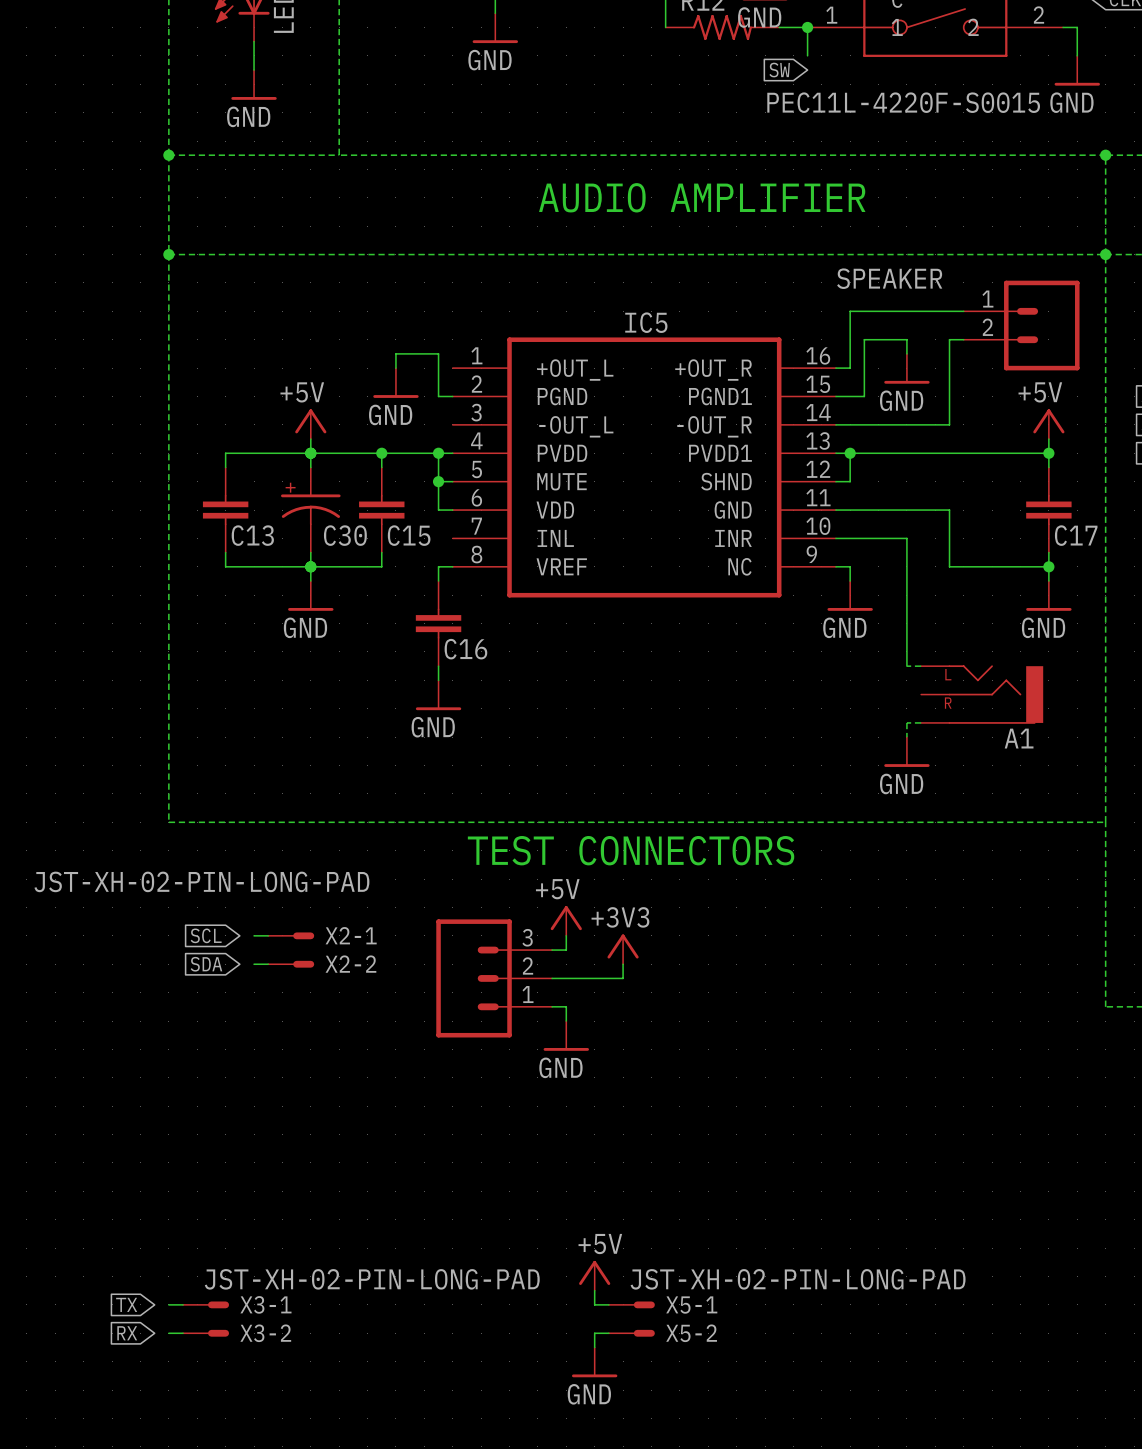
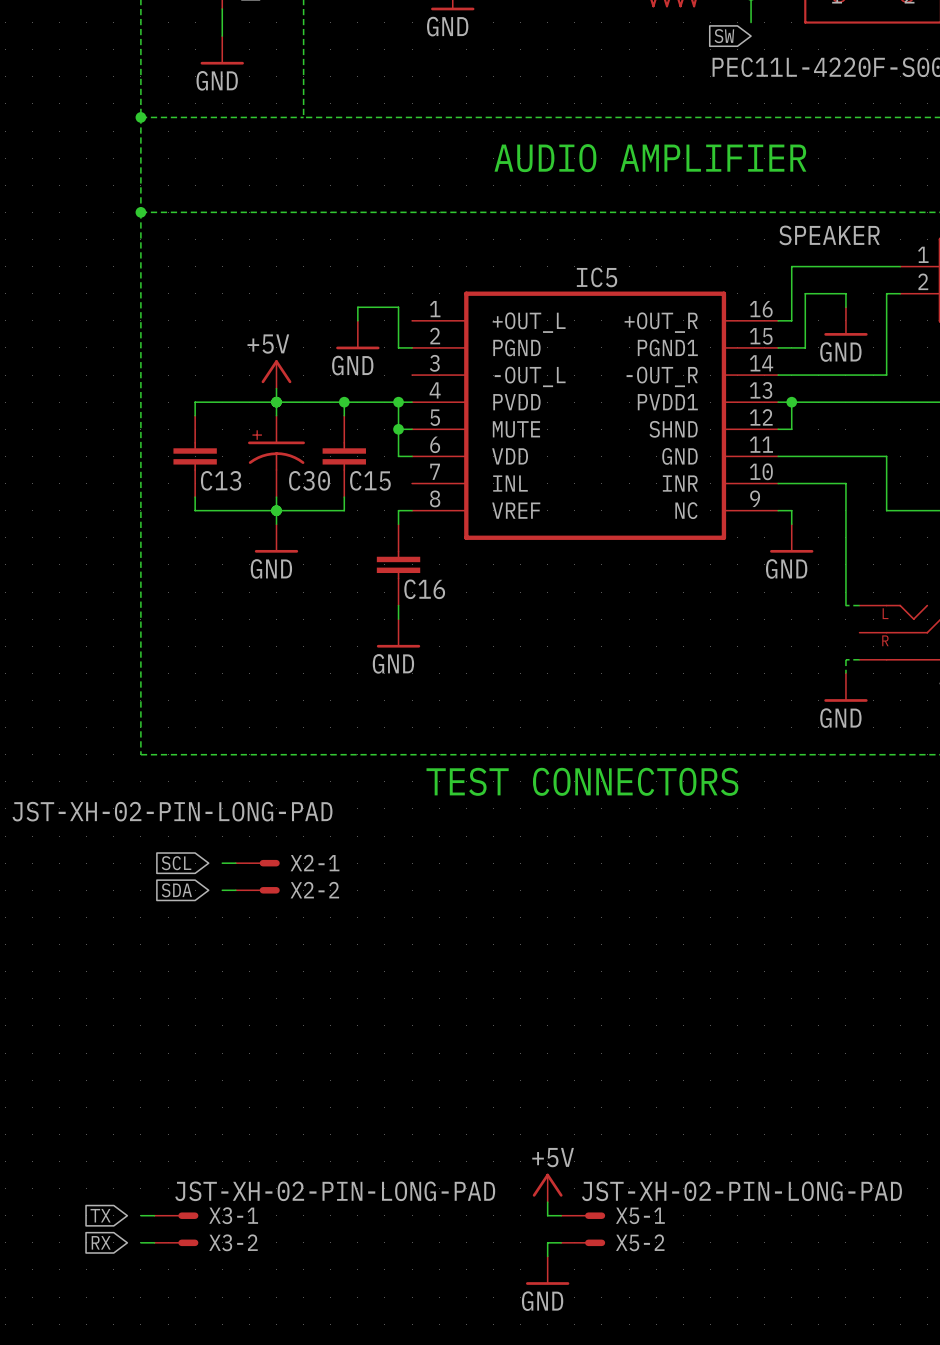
power symbol: +5V (566, 920) -> none
wire: (566, 935) (566, 950) (552, 950) -> none
power symbol: +3V3 (623, 949) -> none
wire: (623, 964) (623, 978) (552, 978) -> none
part: (494, 978) -> none
wire: (552, 1006) (566, 1006) (566, 1021) -> none
power symbol: GND (566, 1035) -> none

